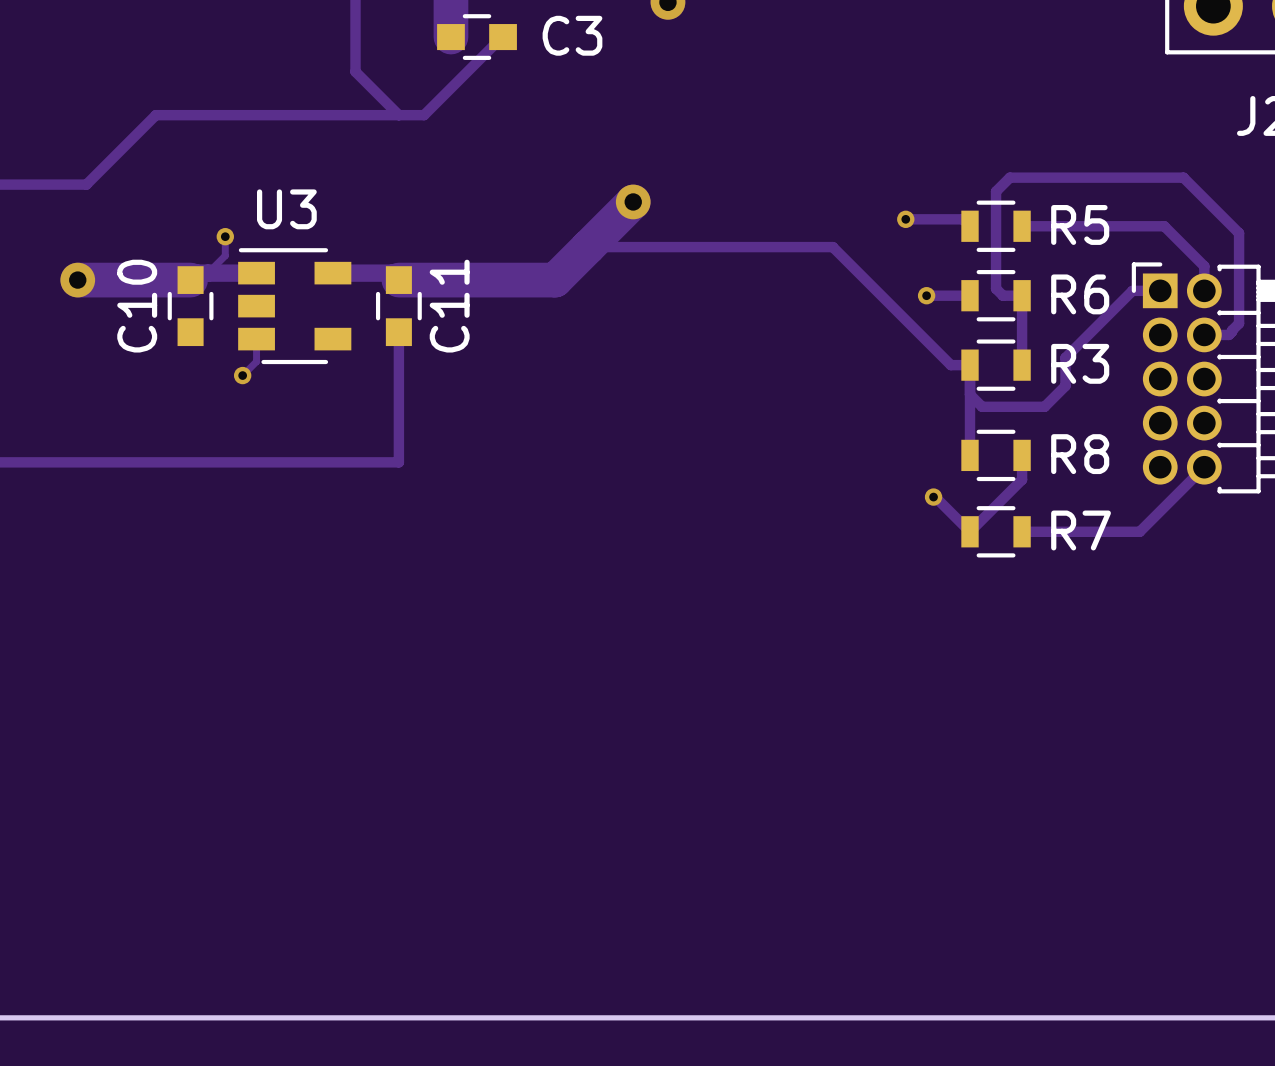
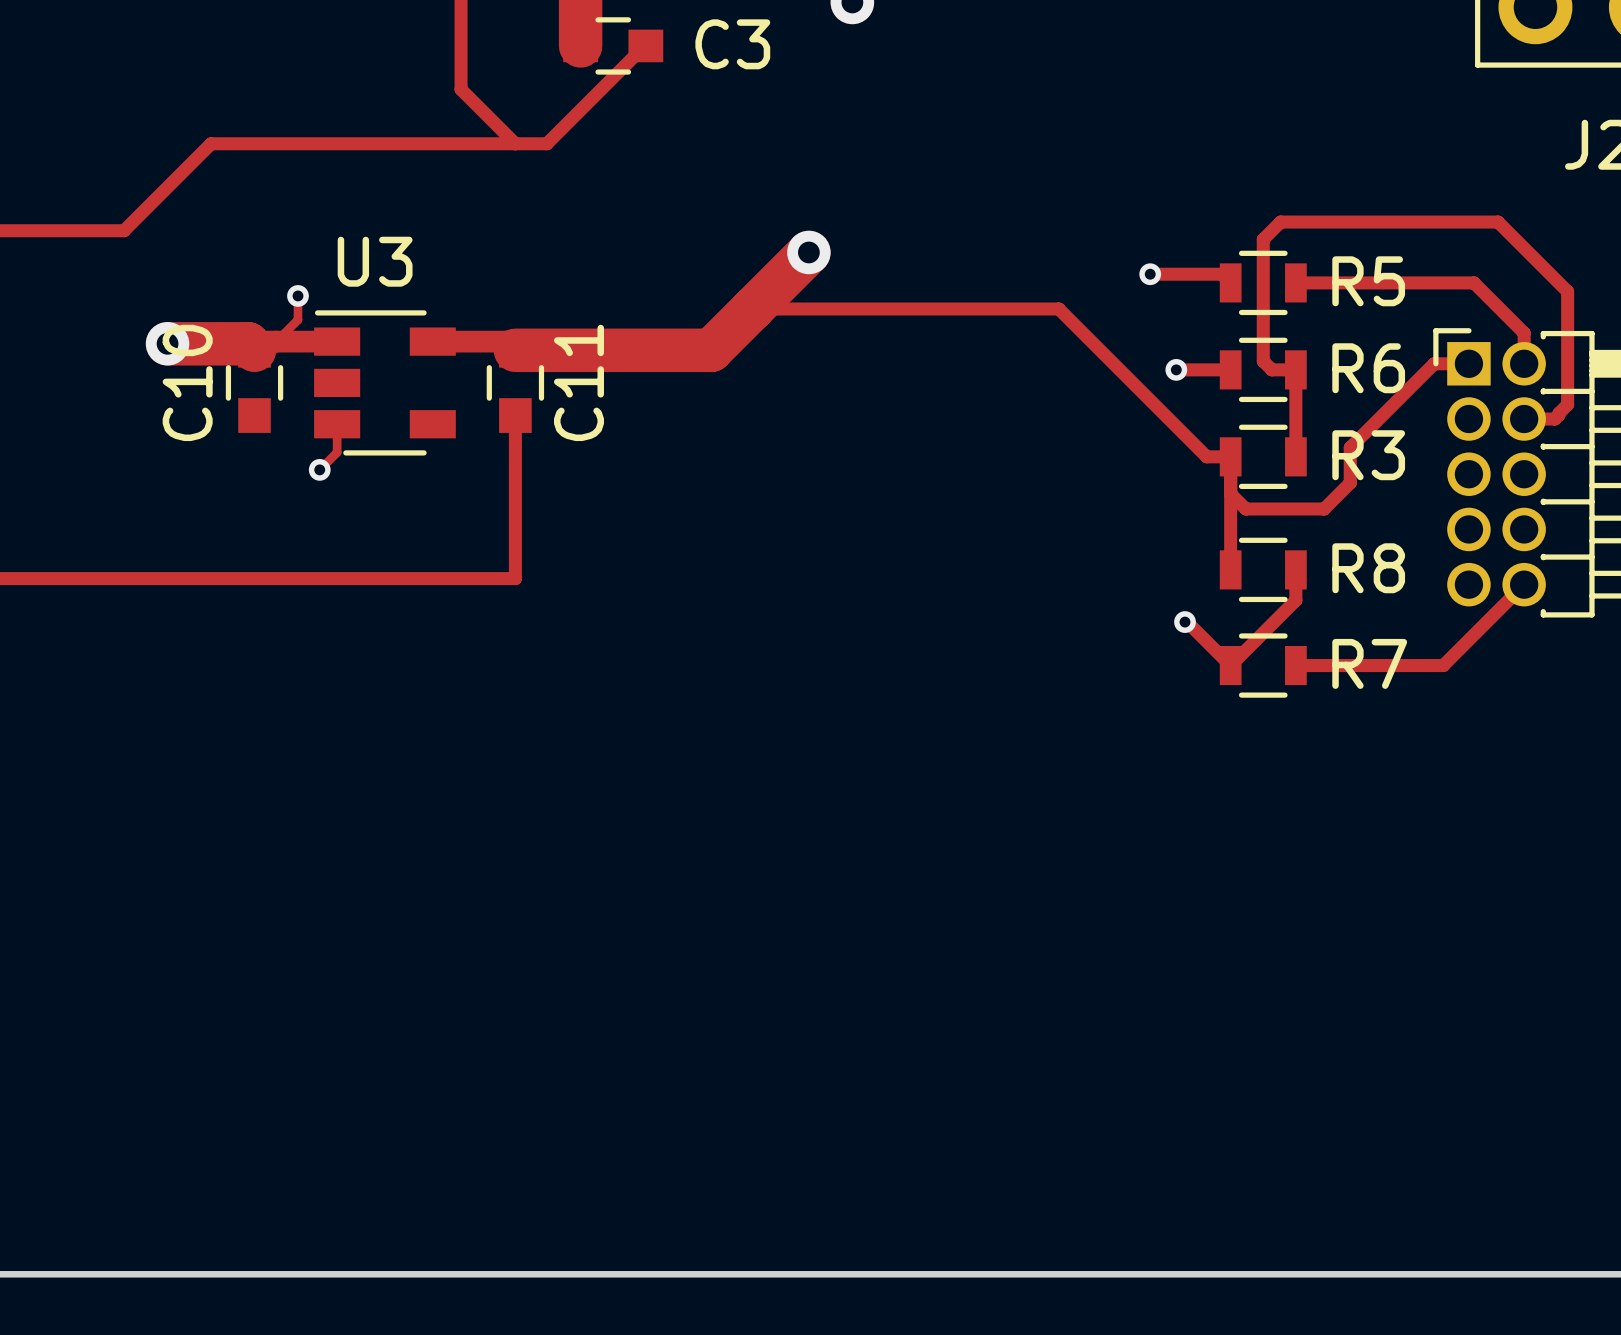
track: (77, 280) (190, 280) -> (167, 343) (247, 343) (254, 350)
via position: (77, 280) -> (167, 343)

